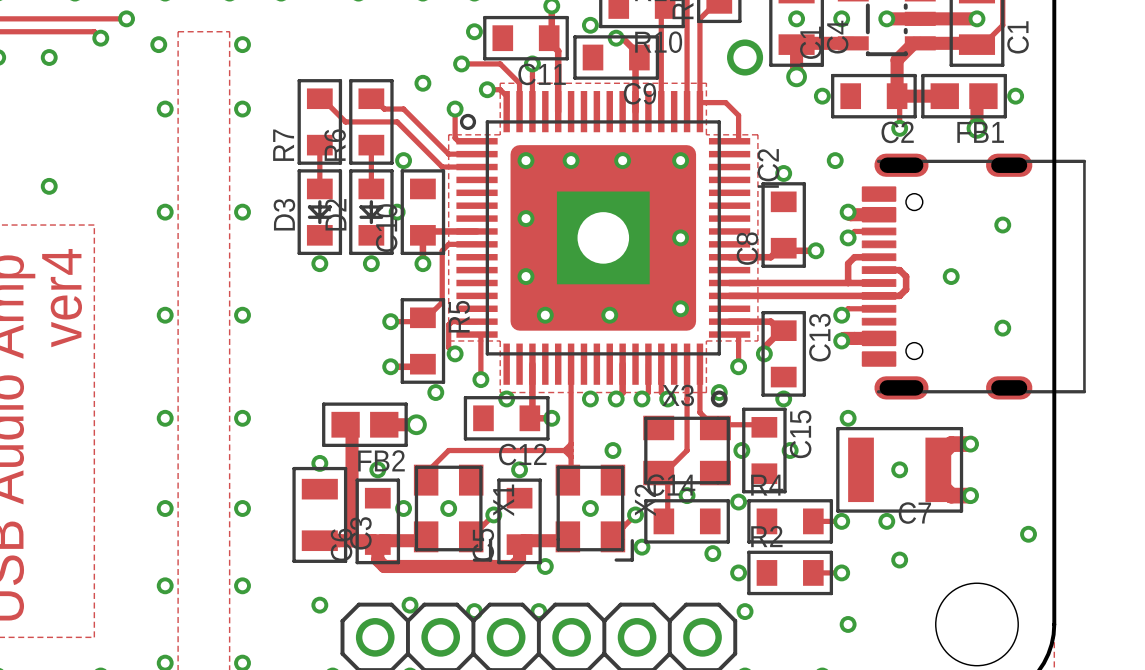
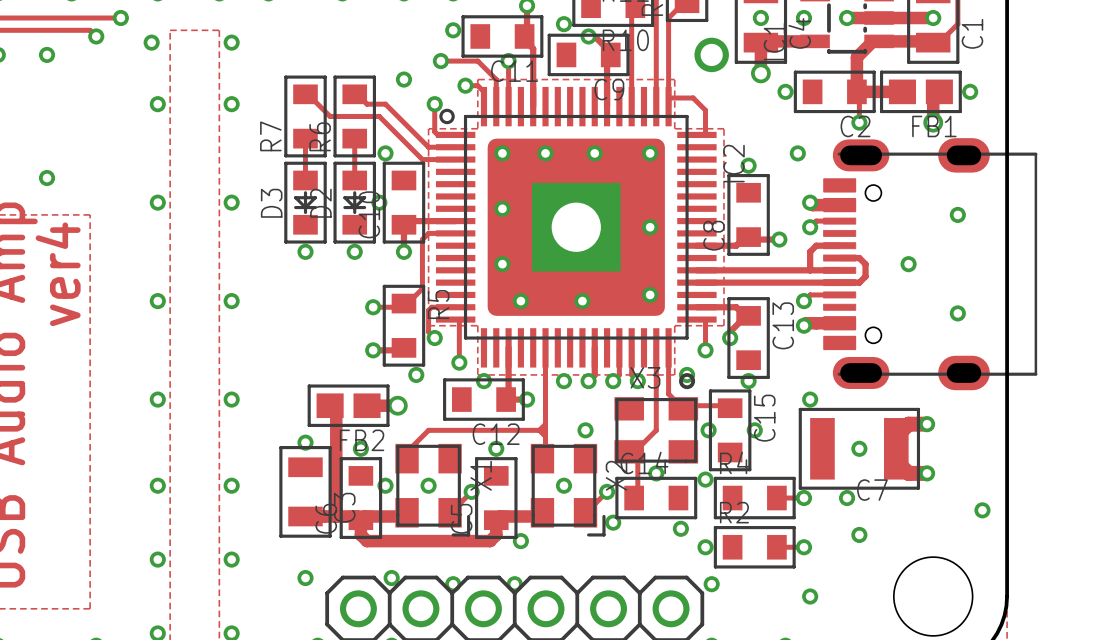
part footprint: [861, 153, 1087, 400] -> [823, 138, 1038, 391]

